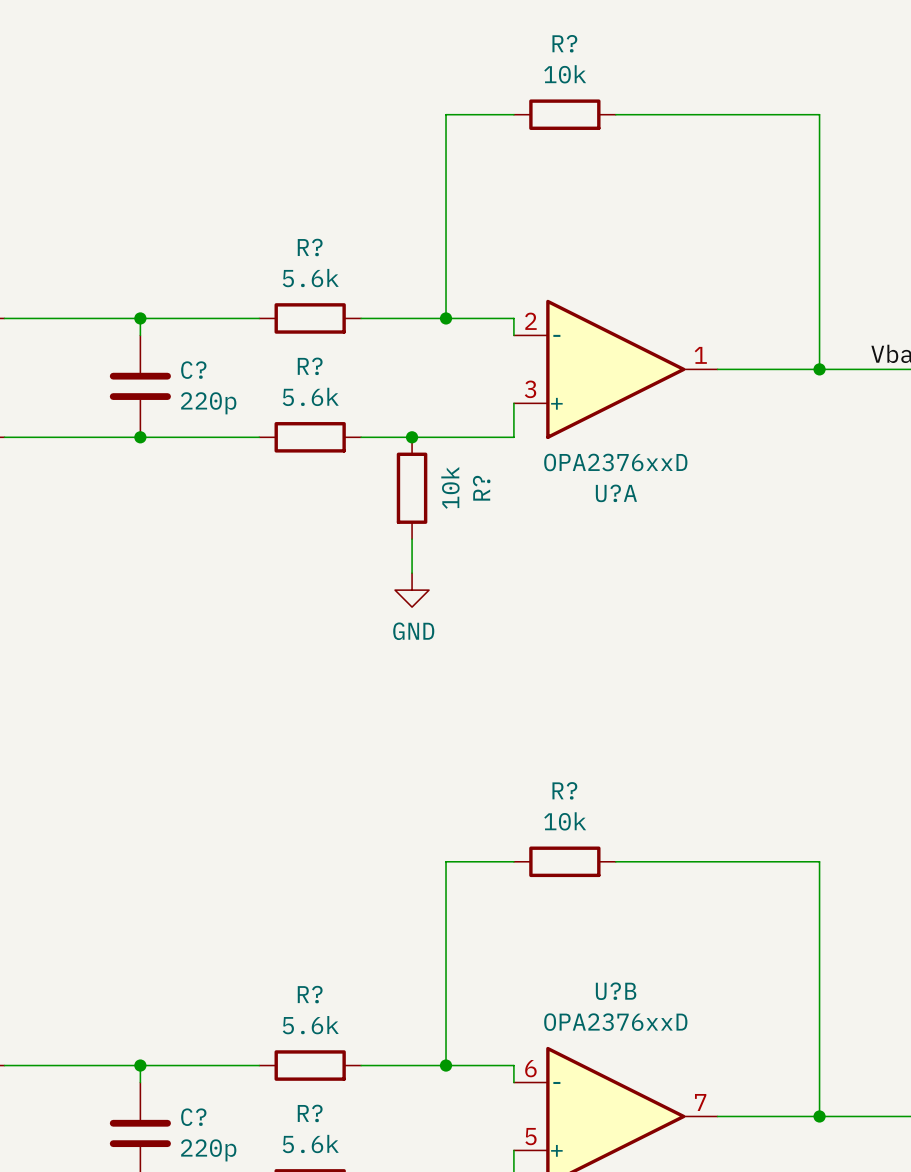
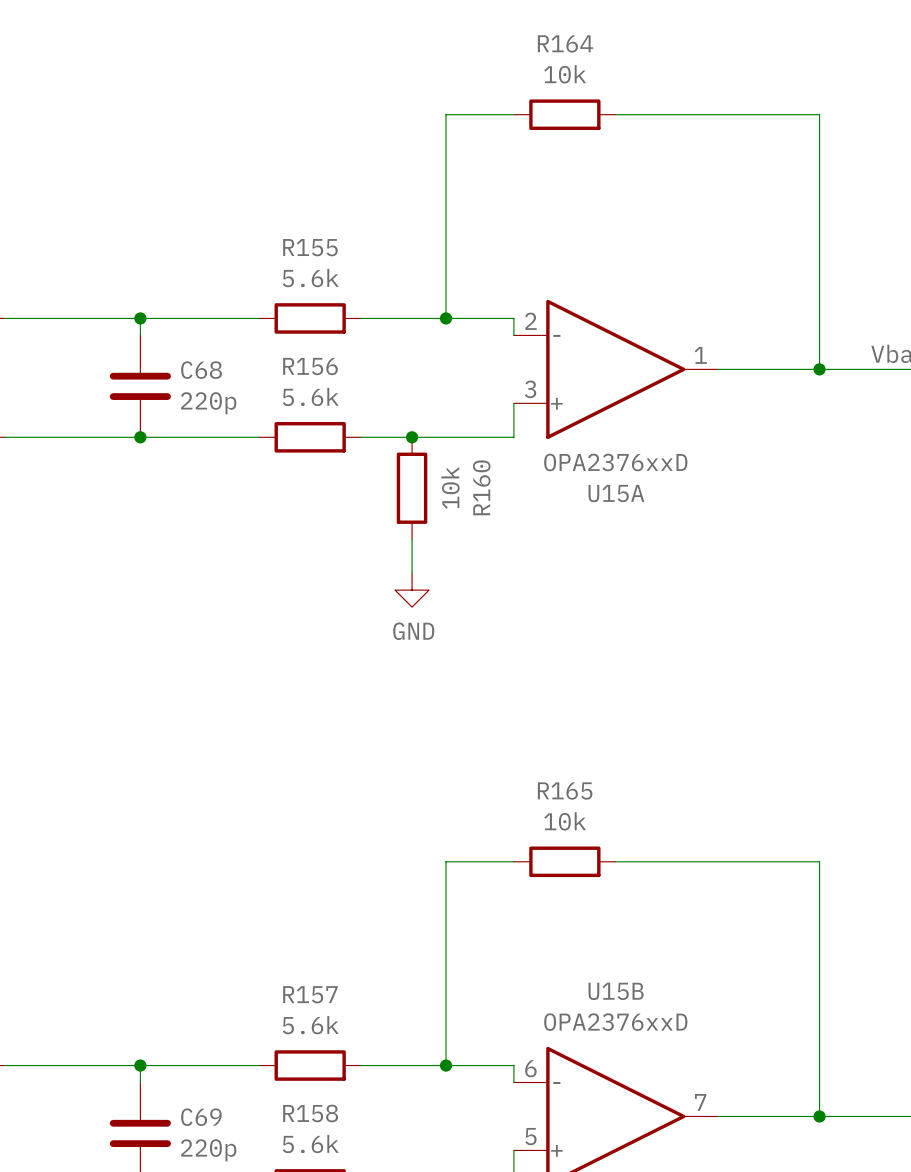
R? name: R? (564, 43) -> R164 (565, 43)
R? name: R? (310, 247) -> R155 (310, 247)
R? name: R? (310, 366) -> R156 (310, 366)
C? name: C? (193, 370) -> C68 (201, 370)
R? name: R? (481, 488) -> R160 (481, 487)
U?A name: U?A (616, 493) -> U15A (616, 493)
R? name: R? (564, 790) -> R165 (565, 791)
U?B name: U?B (616, 991) -> U15B (616, 991)
R? name: R? (310, 994) -> R157 (310, 994)
R? name: R? (310, 1113) -> R158 (310, 1113)
C? name: C? (193, 1117) -> C69 (201, 1117)

